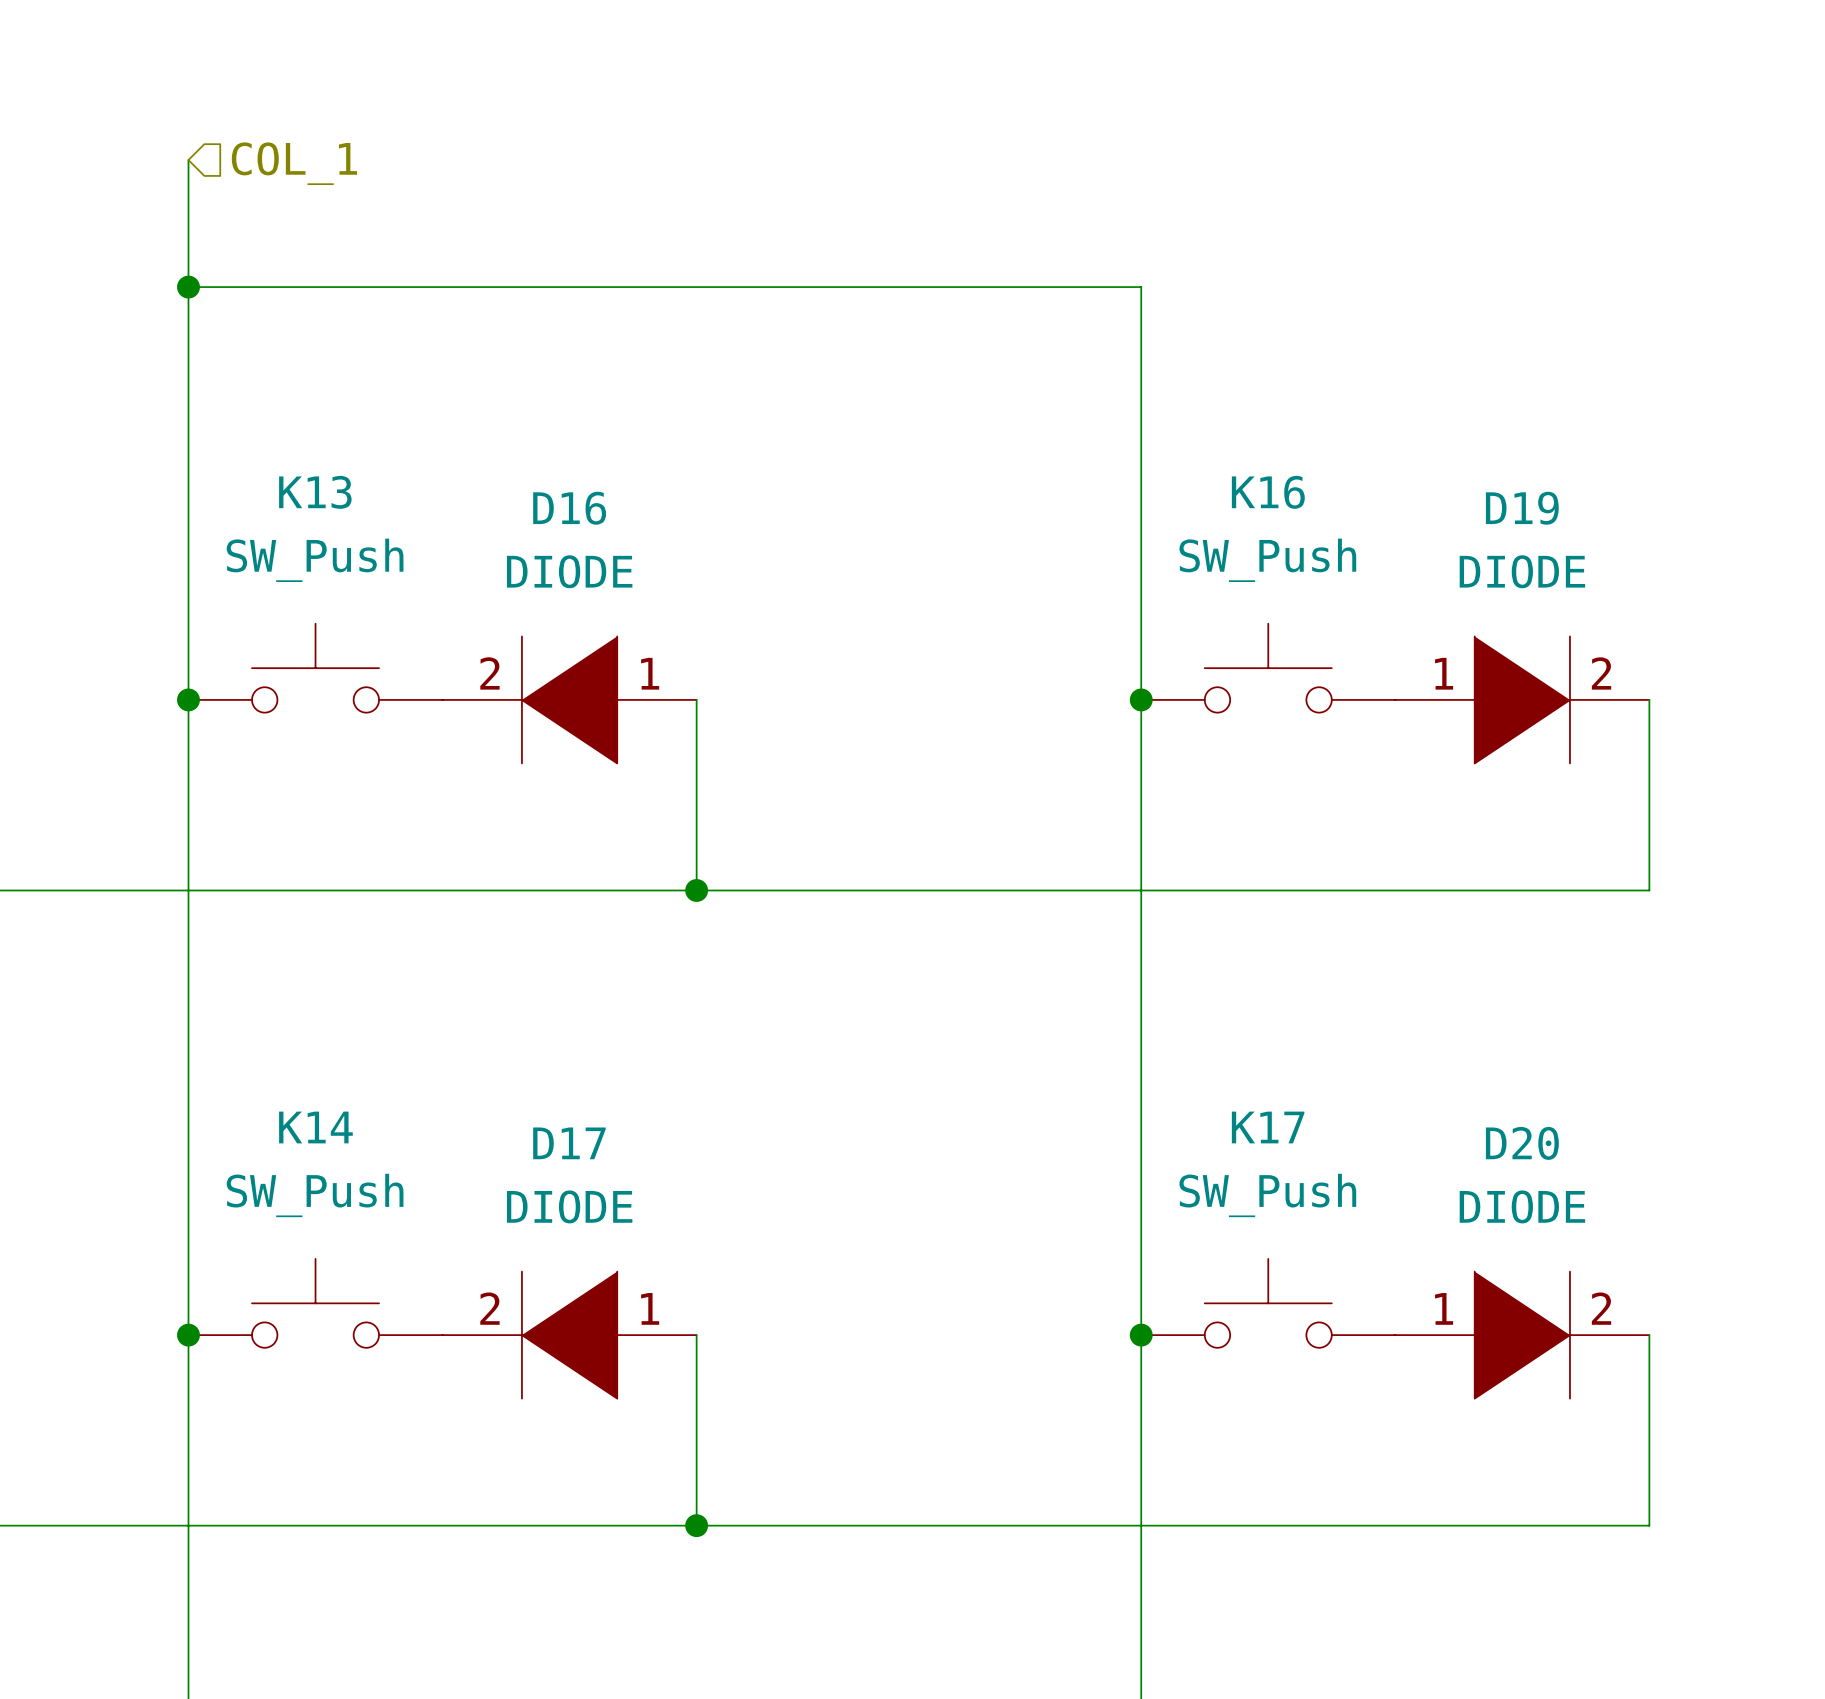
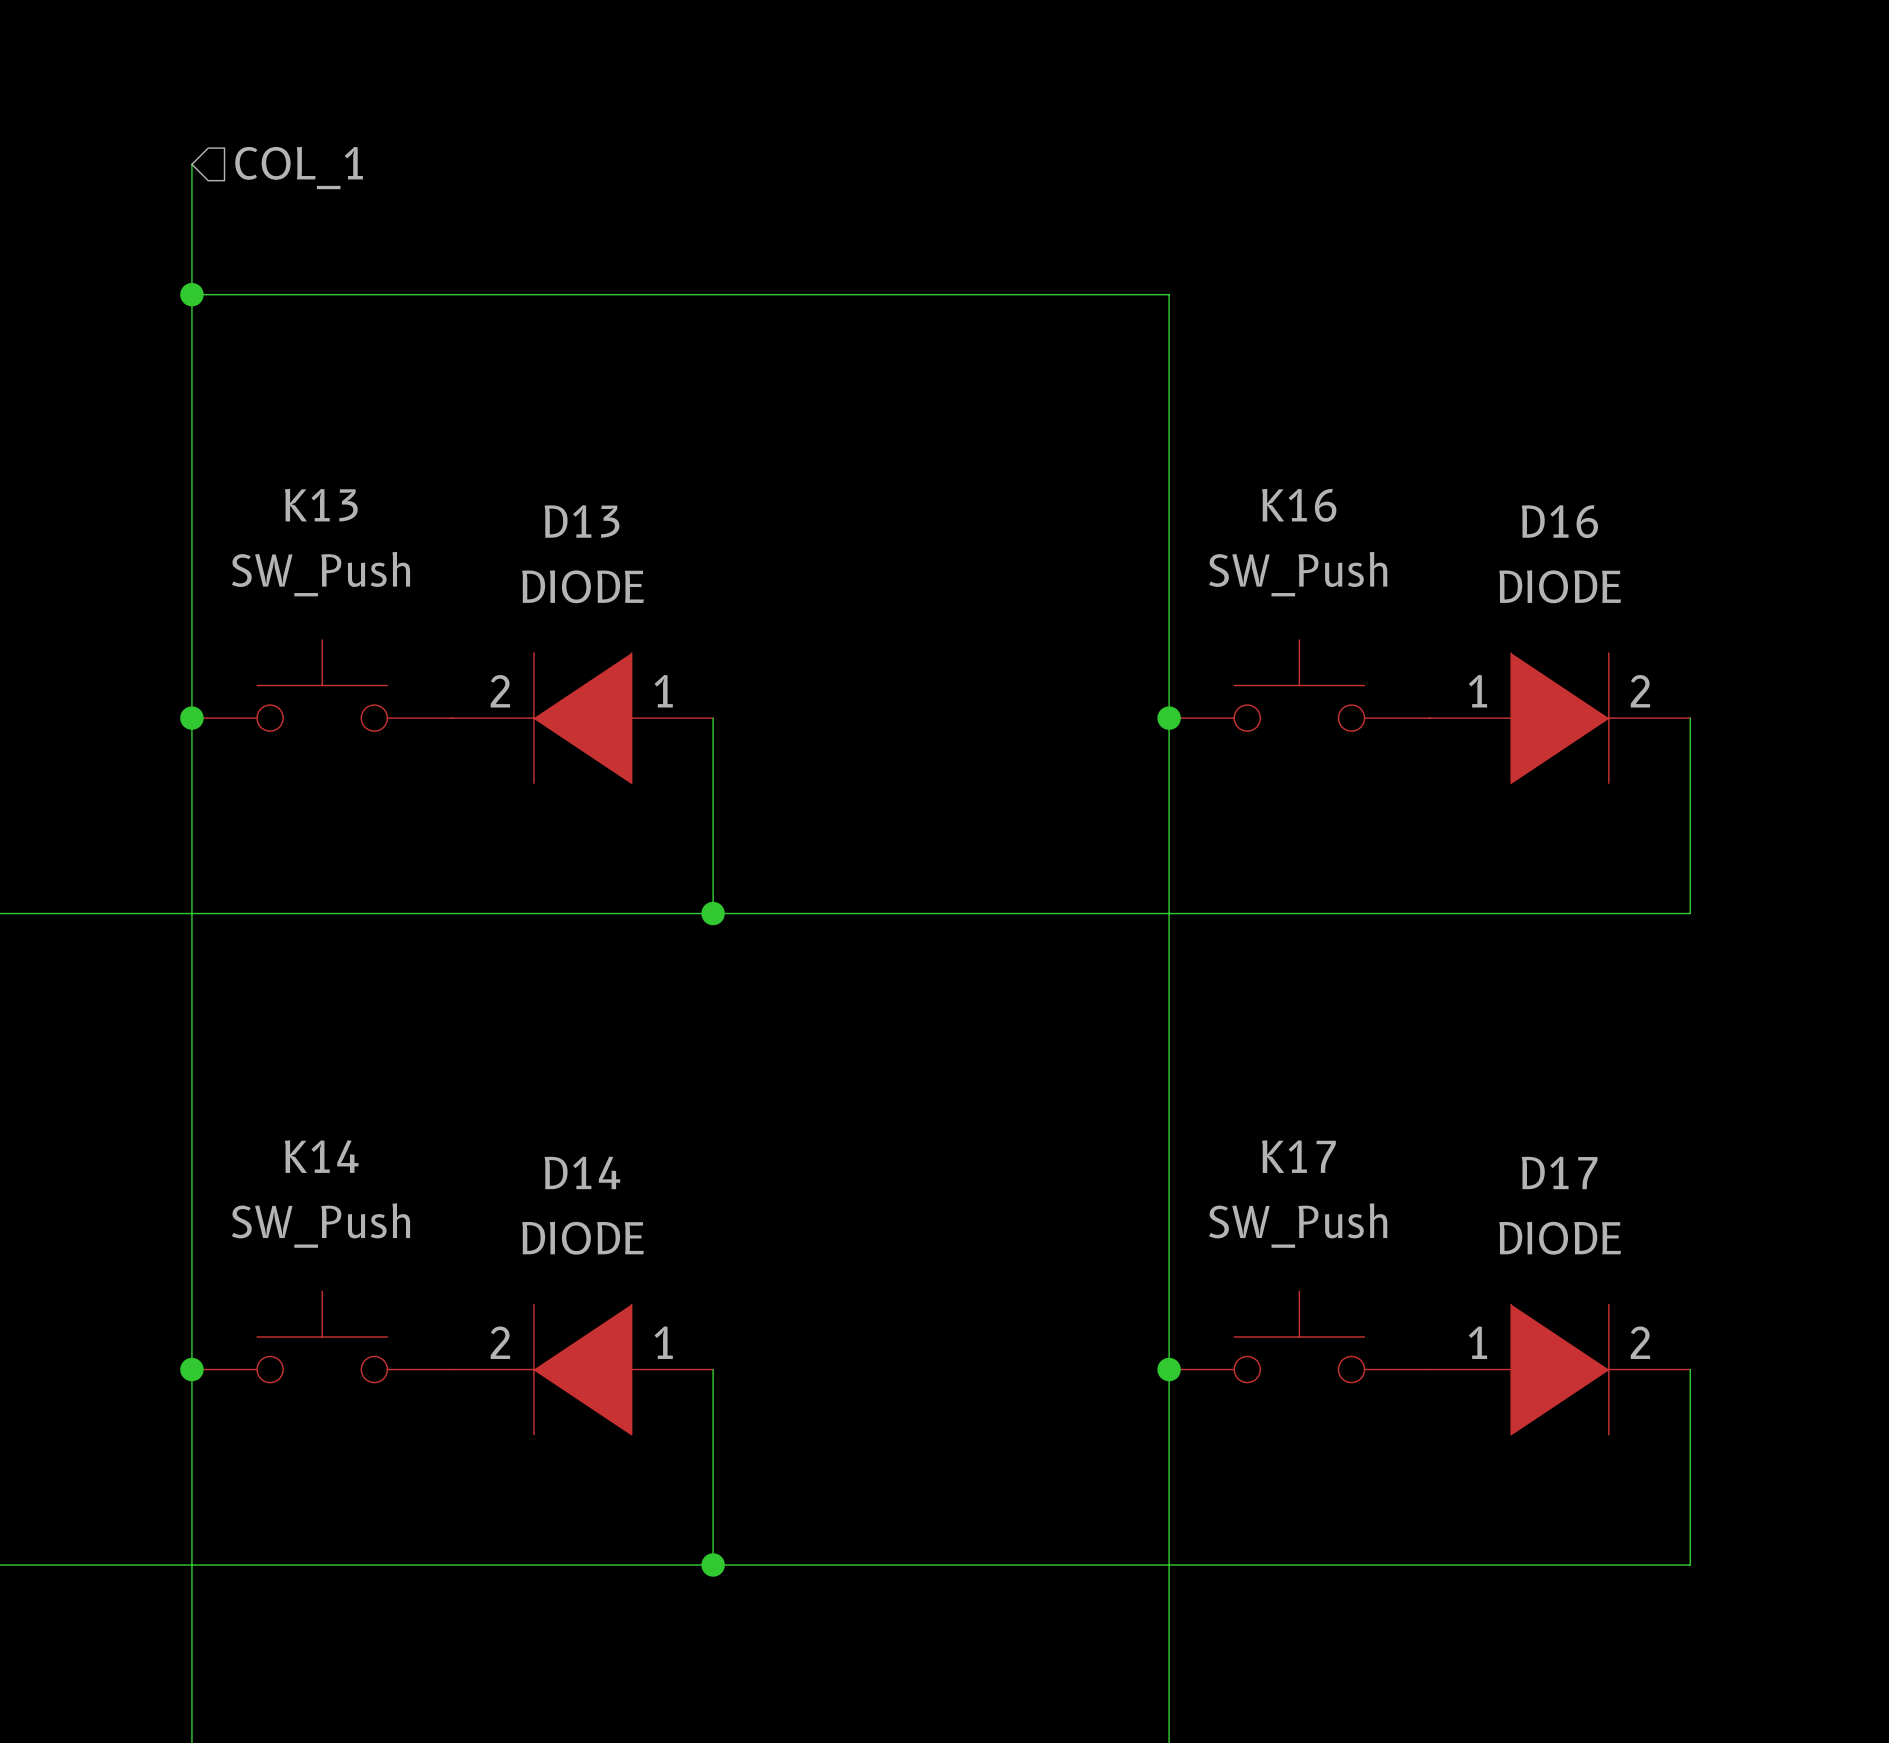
D16 name: D16 (569, 508) -> D13 (582, 521)
D19 name: D19 (1522, 508) -> D16 (1559, 521)
D17 name: D17 (569, 1143) -> D14 (582, 1172)
D20 name: D20 (1522, 1143) -> D17 (1559, 1172)

